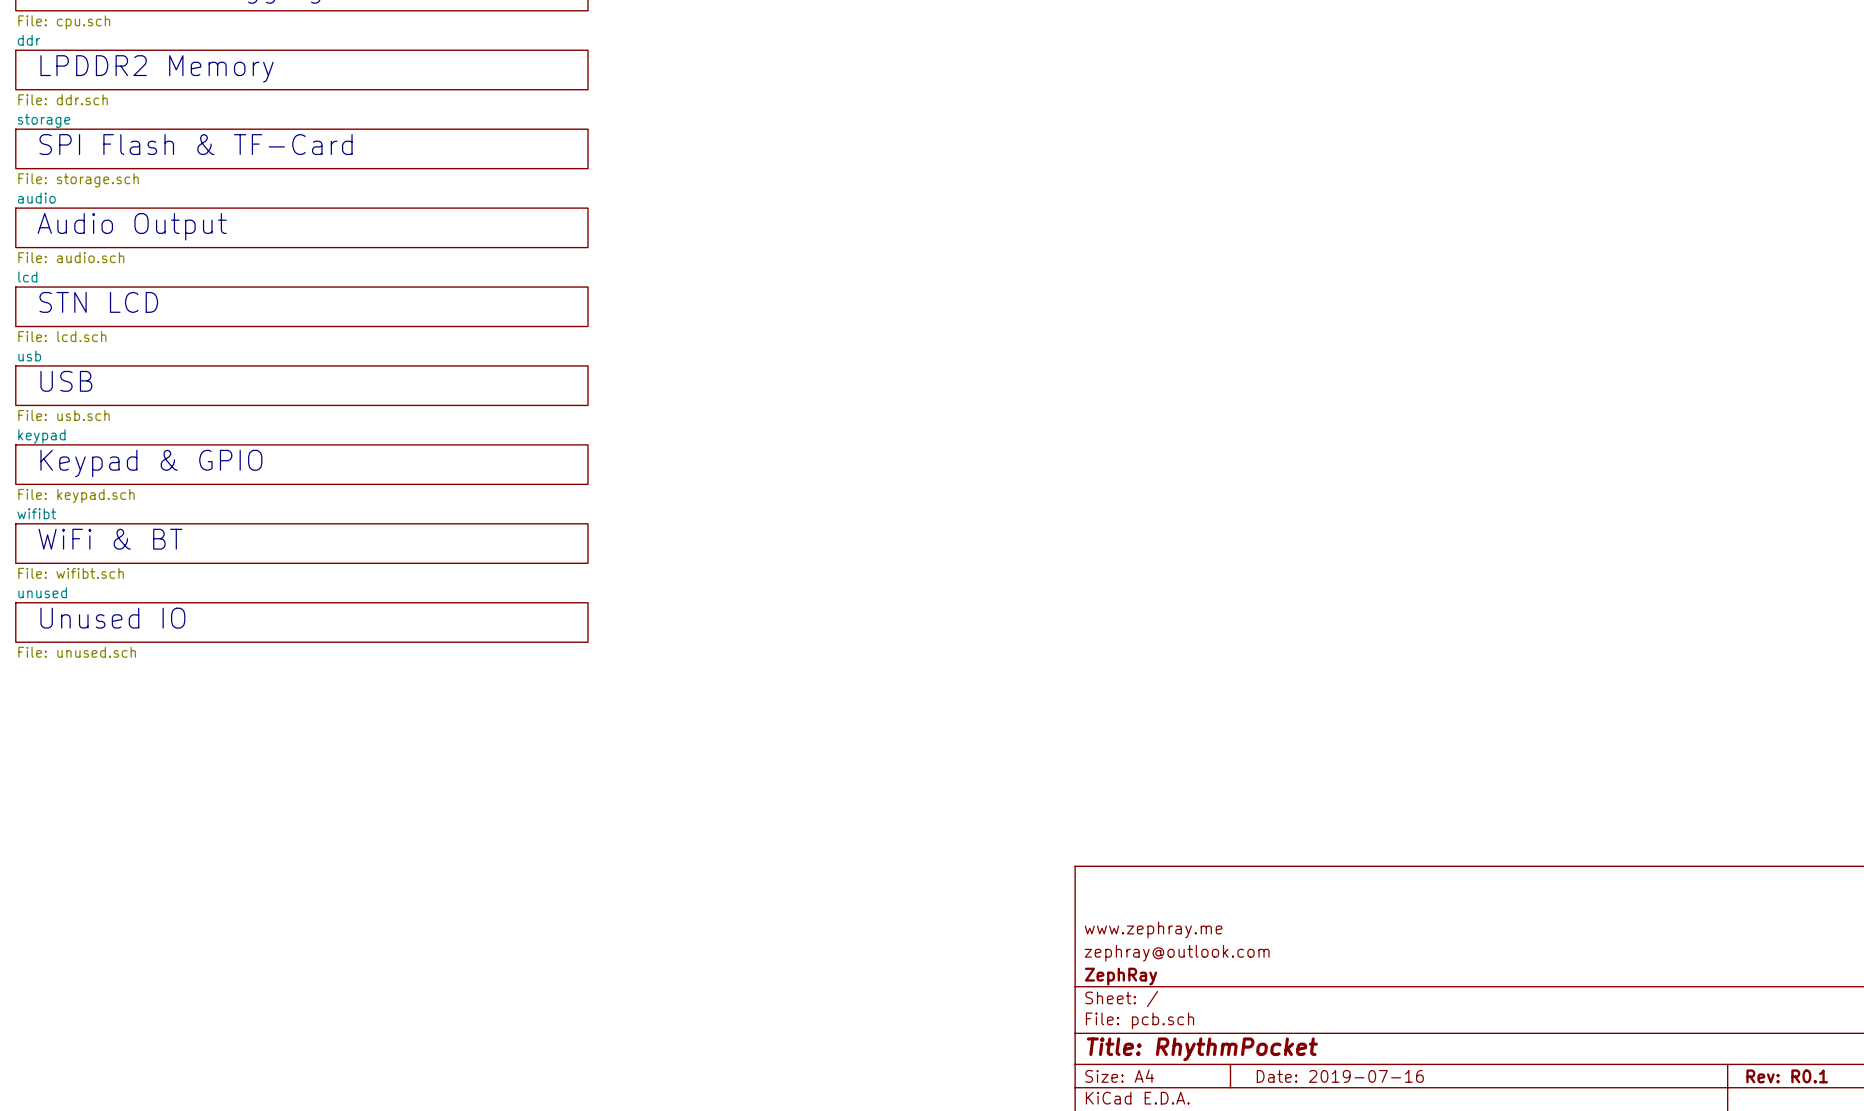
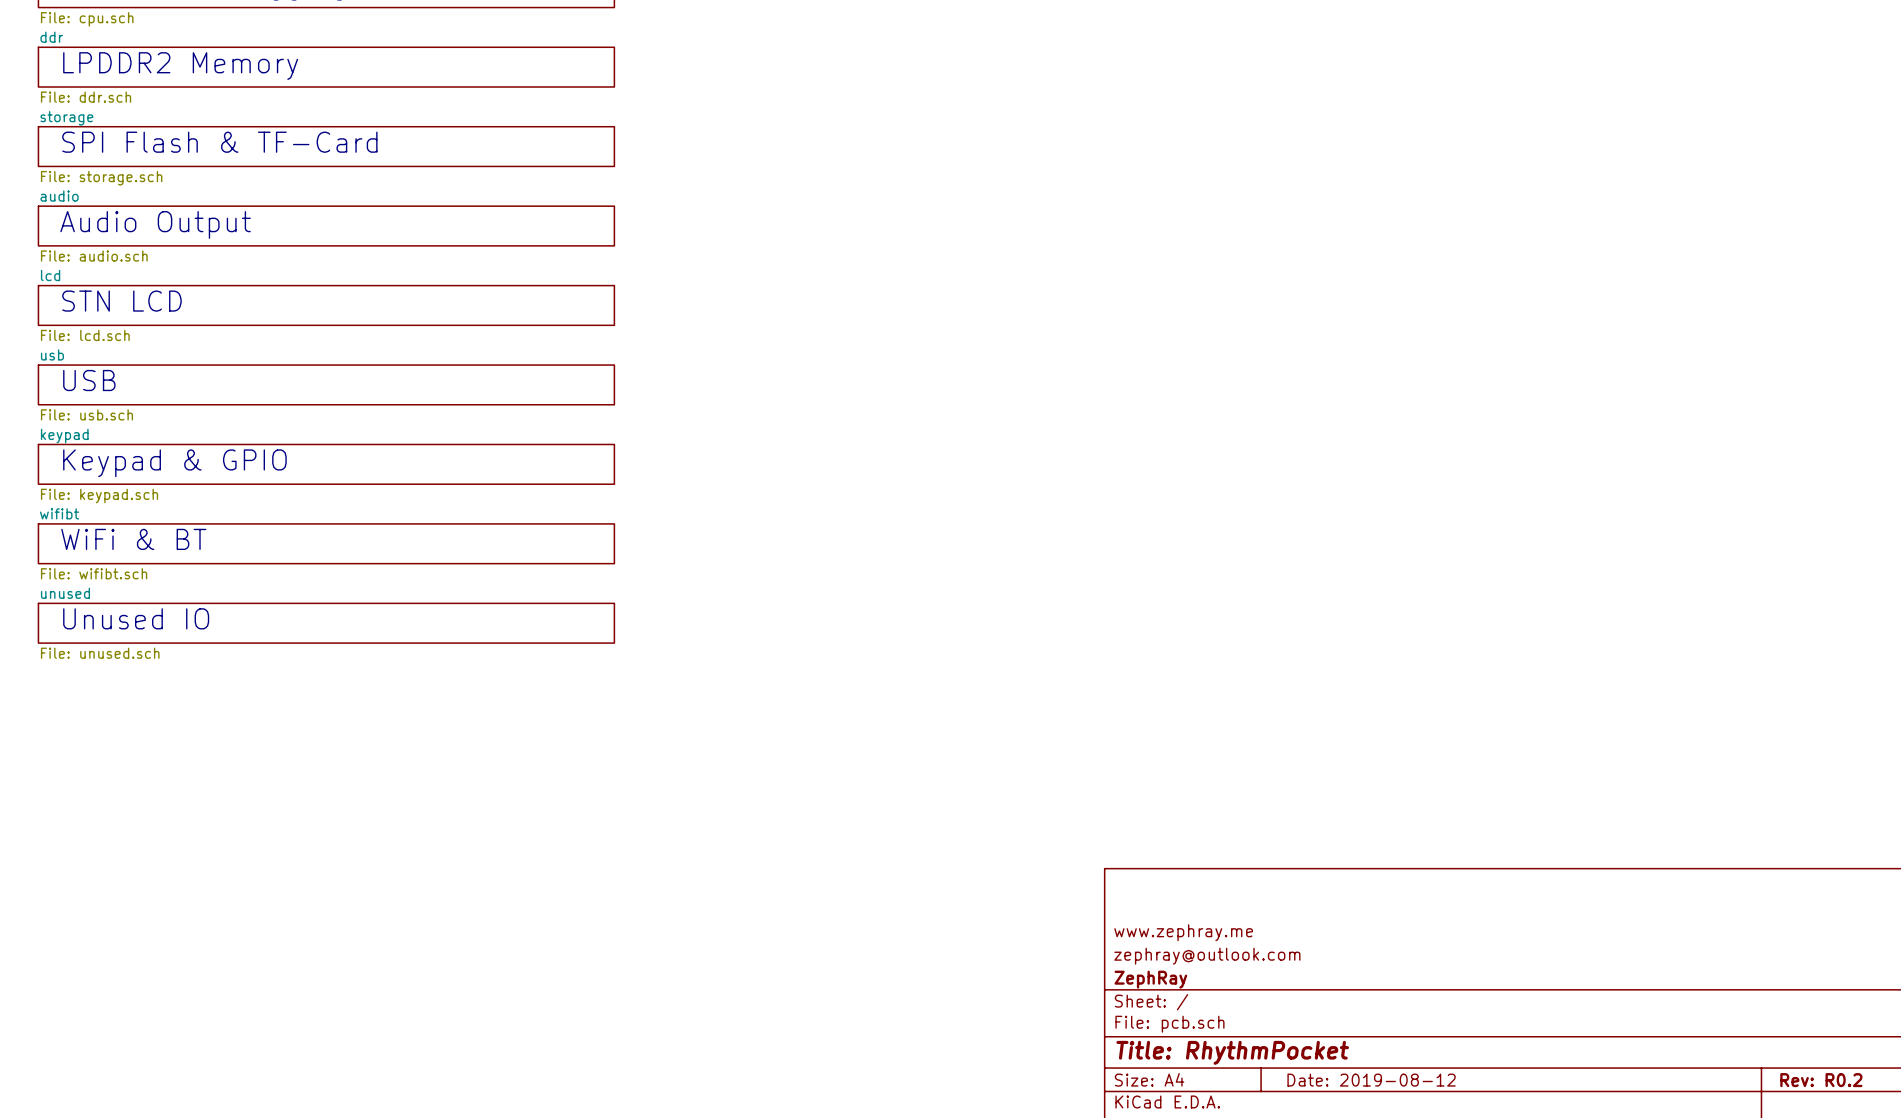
title block: Date: 2019-07-16 (1340, 1076) -> Date: 2019-08-12 (1371, 1080)
title block: Rev: R0.1 (1787, 1076) -> Rev: R0.2 (1821, 1080)

